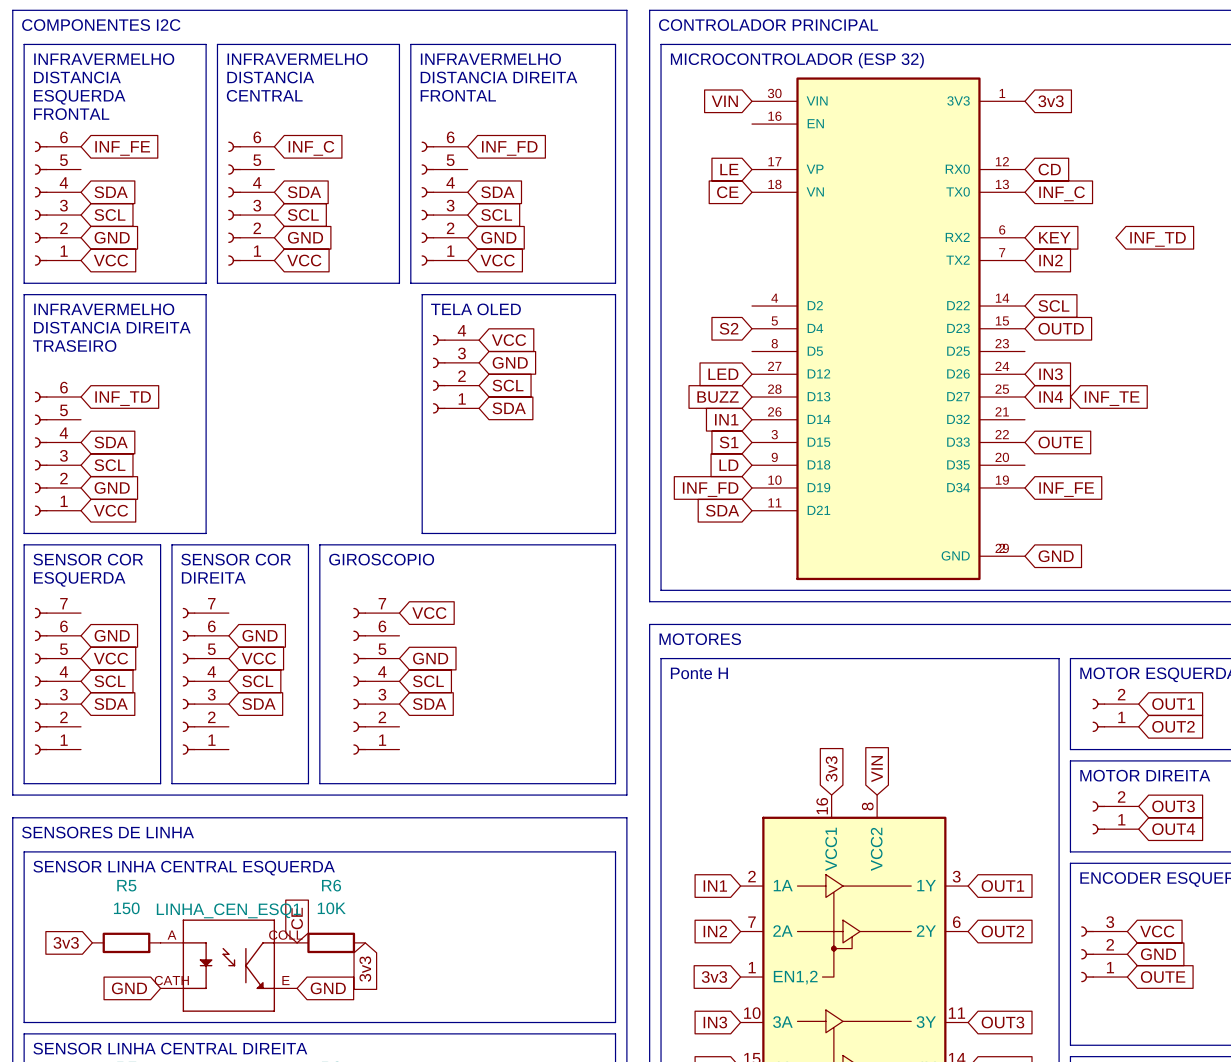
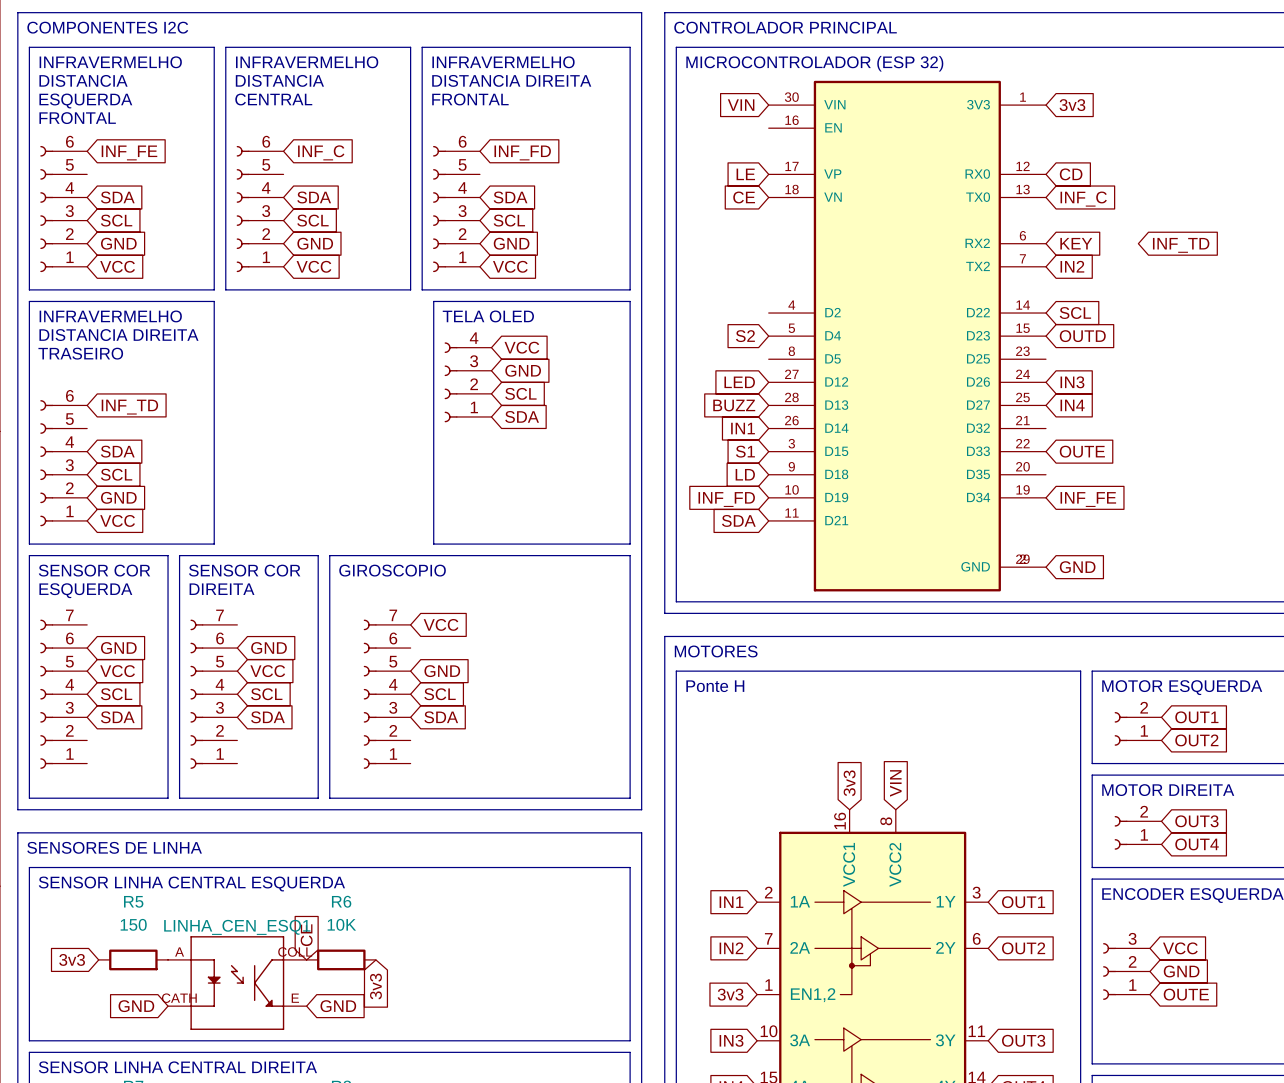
global label: INF_TE (1112, 398) -> none

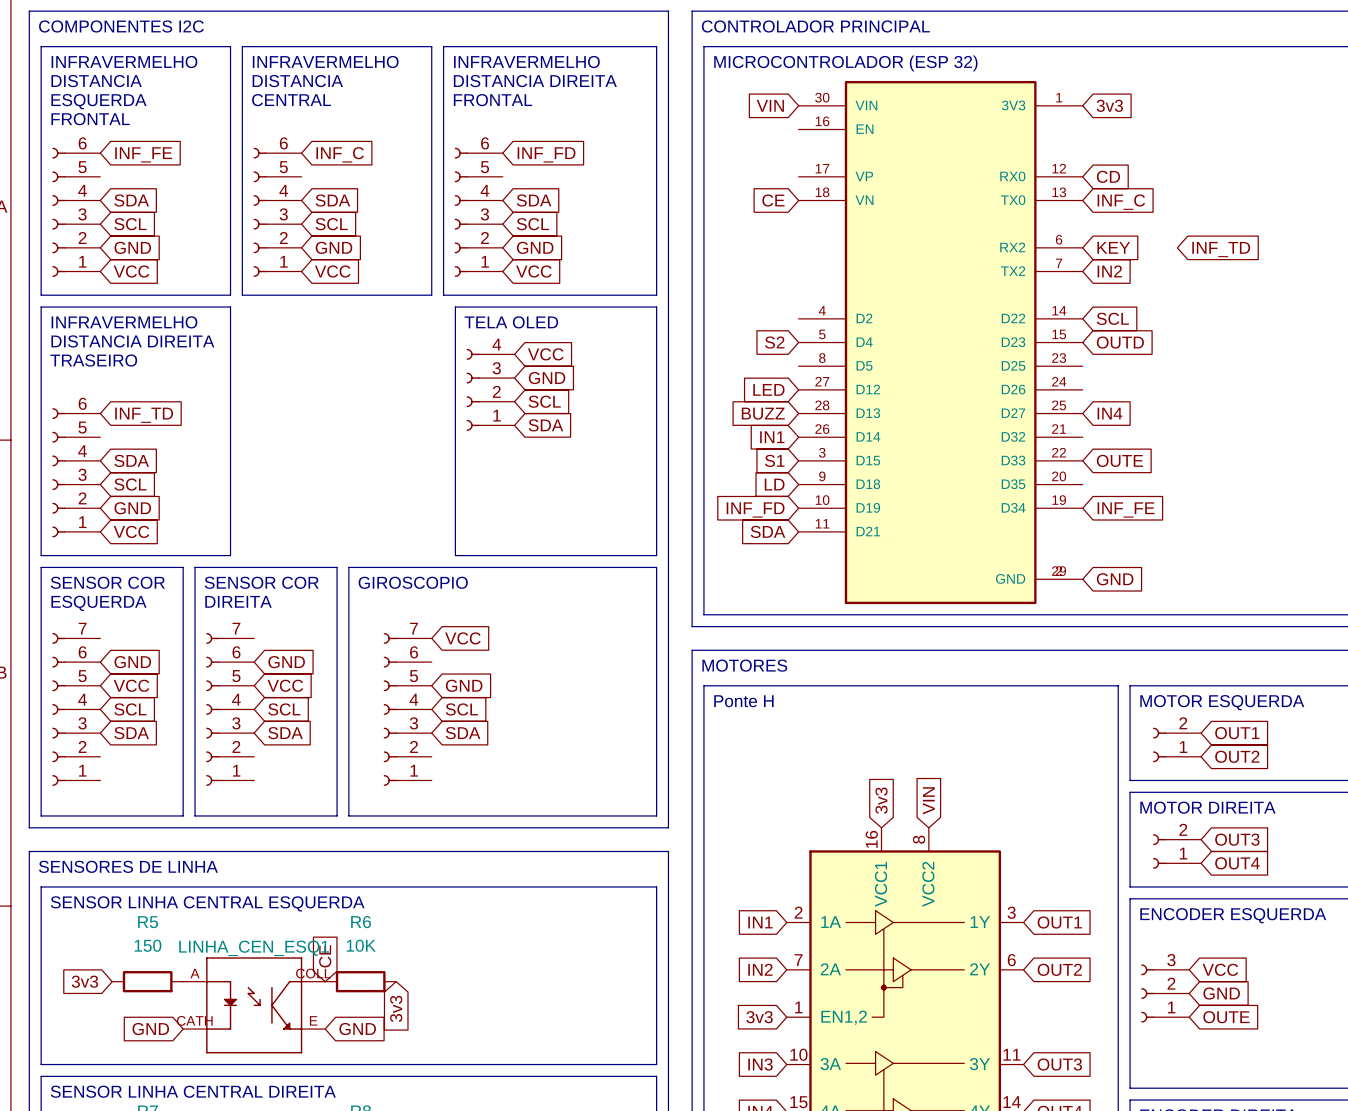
global label: LE (745, 174) -> none
global label: IN3 (1072, 382) -> none

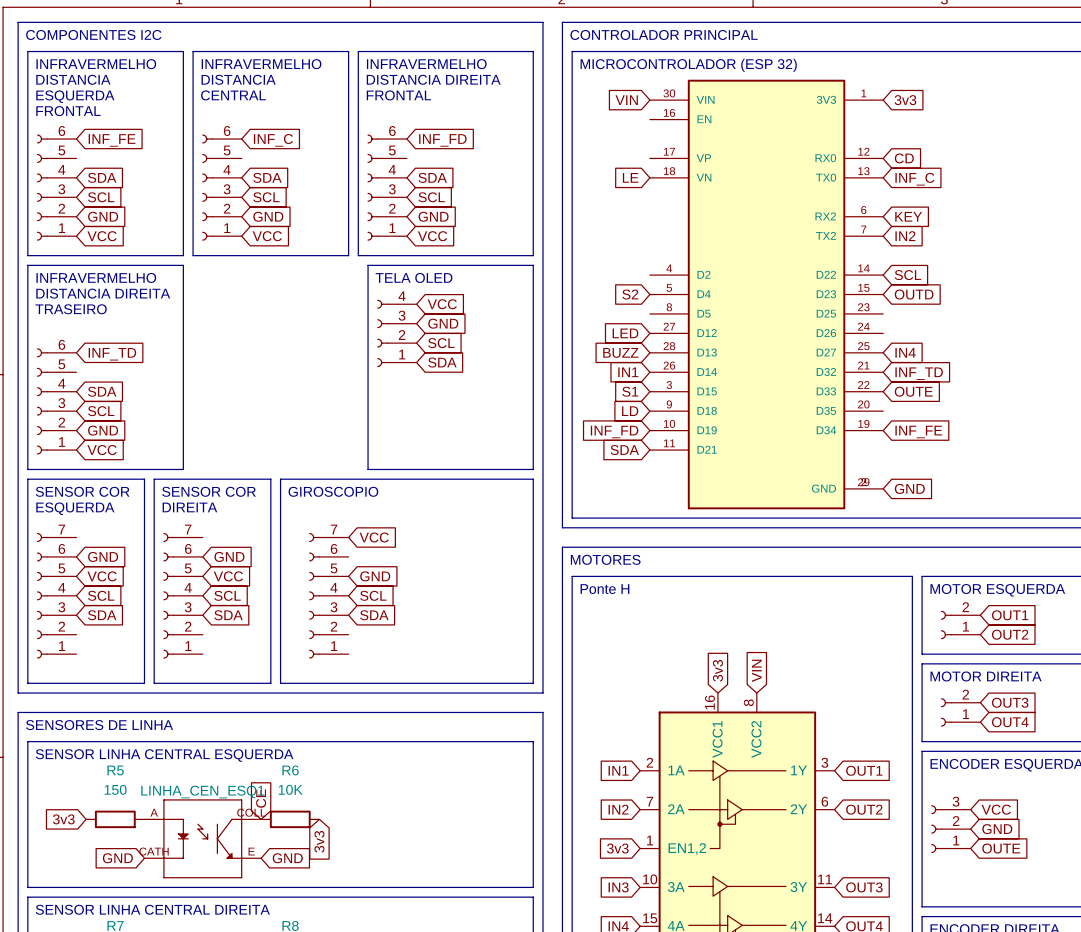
global label: CE (773, 200) -> LE (630, 177)
global label position: INF_TD (1221, 249) -> INF_TD (919, 373)

